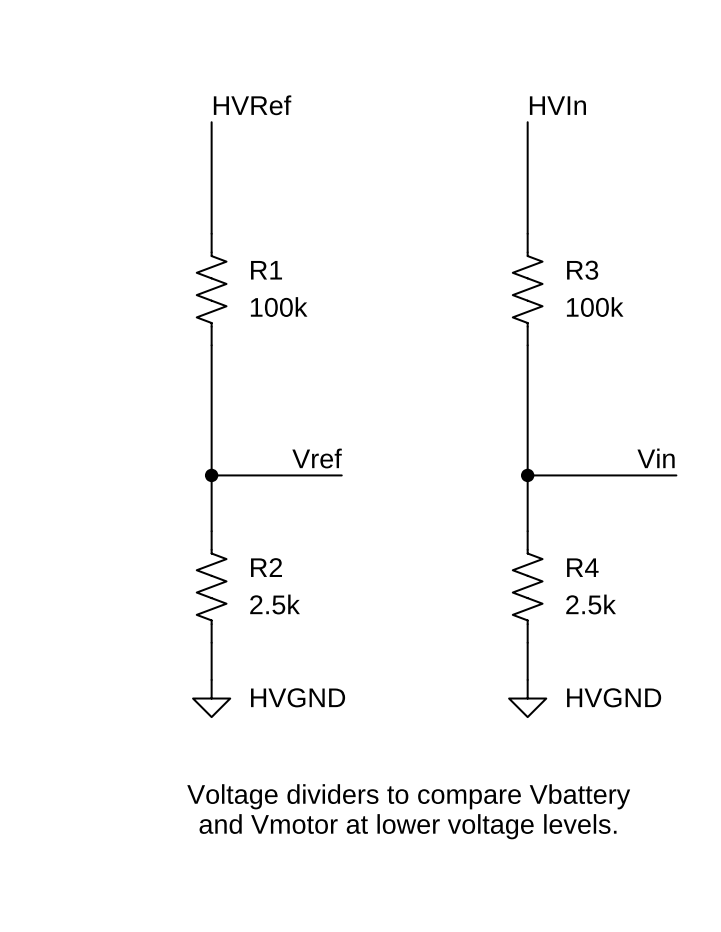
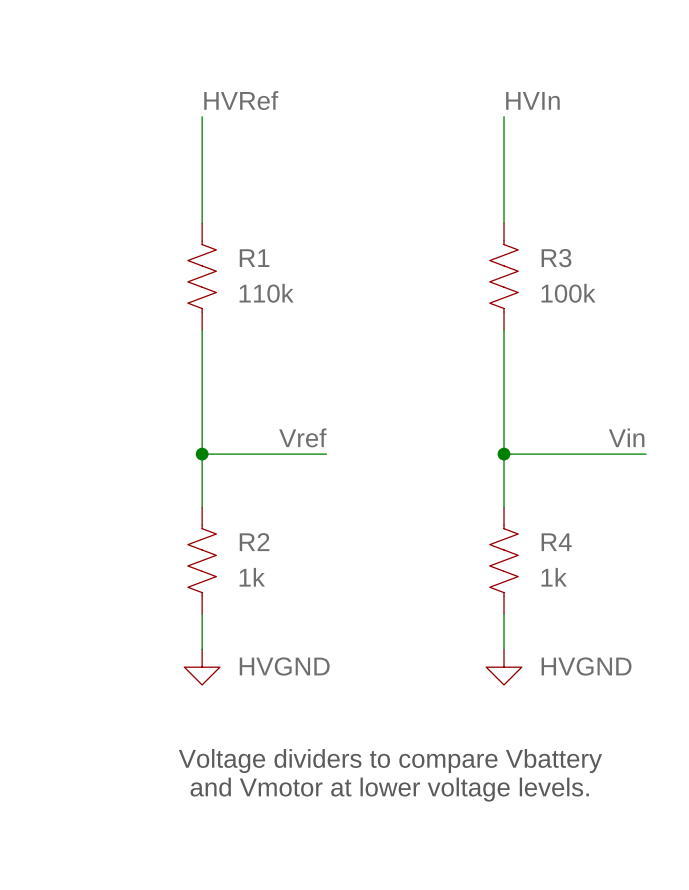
R1 value: 100k (279, 307) -> 110k (266, 293)
R2 value: 2.5k (275, 604) -> 1k (252, 577)
R4 value: 2.5k (591, 604) -> 1k (554, 577)

